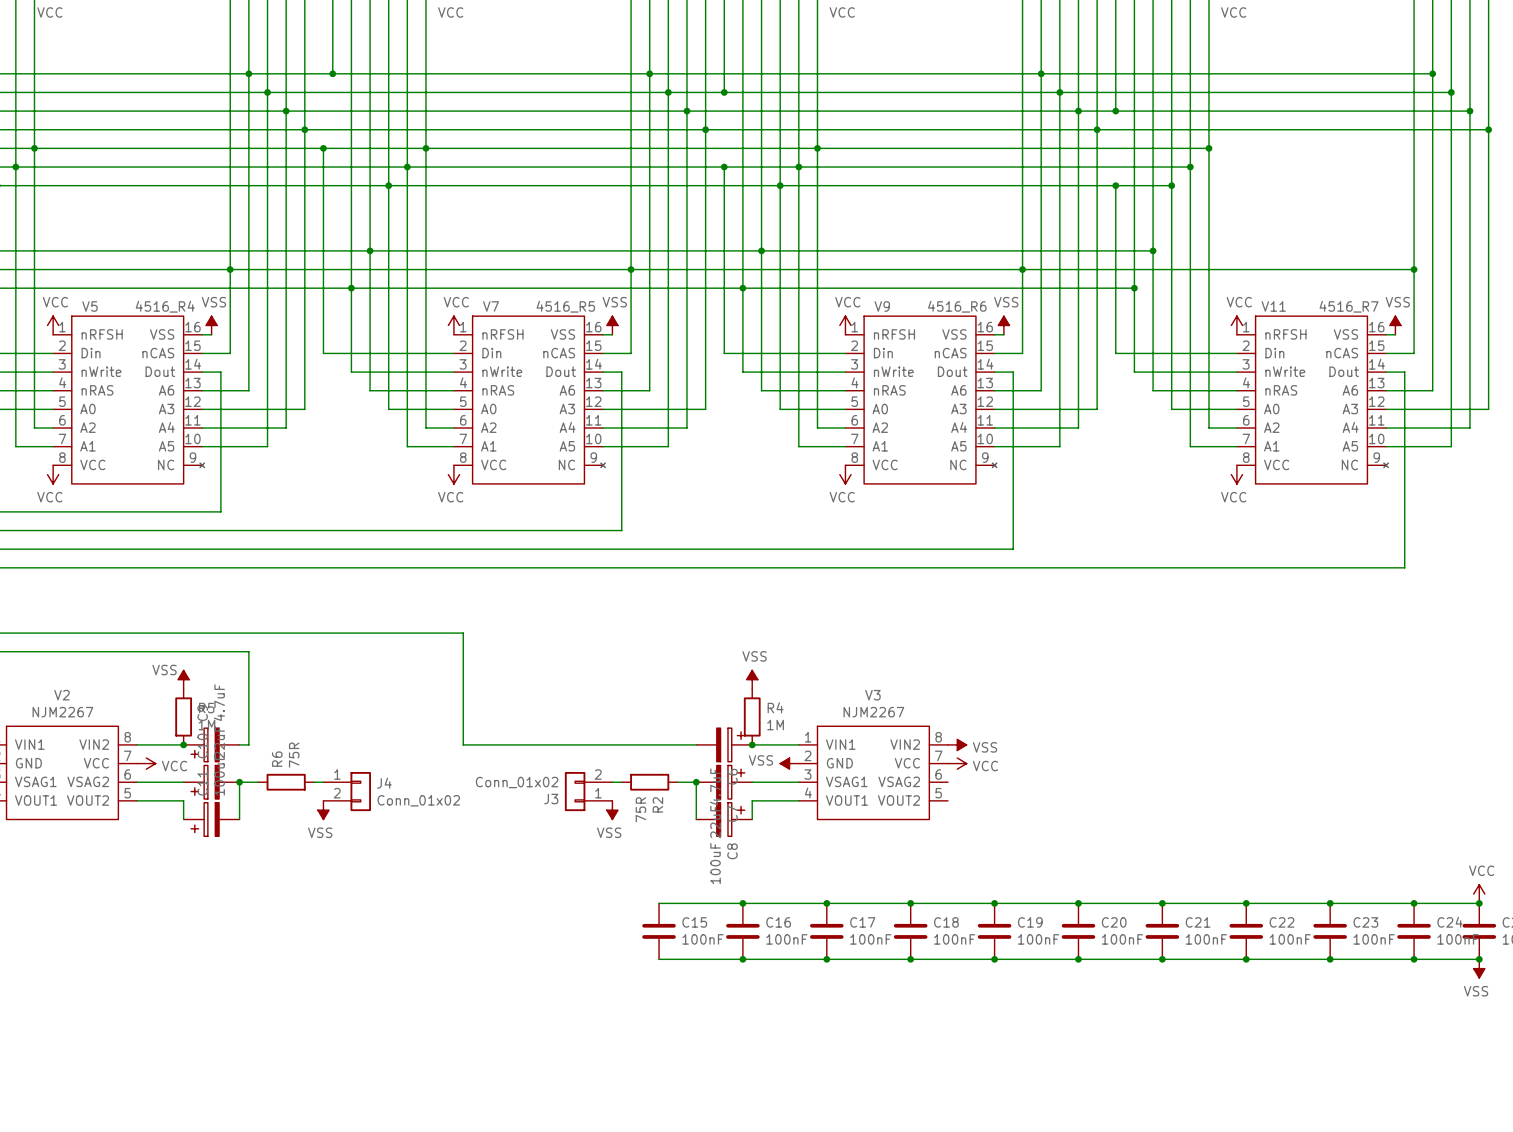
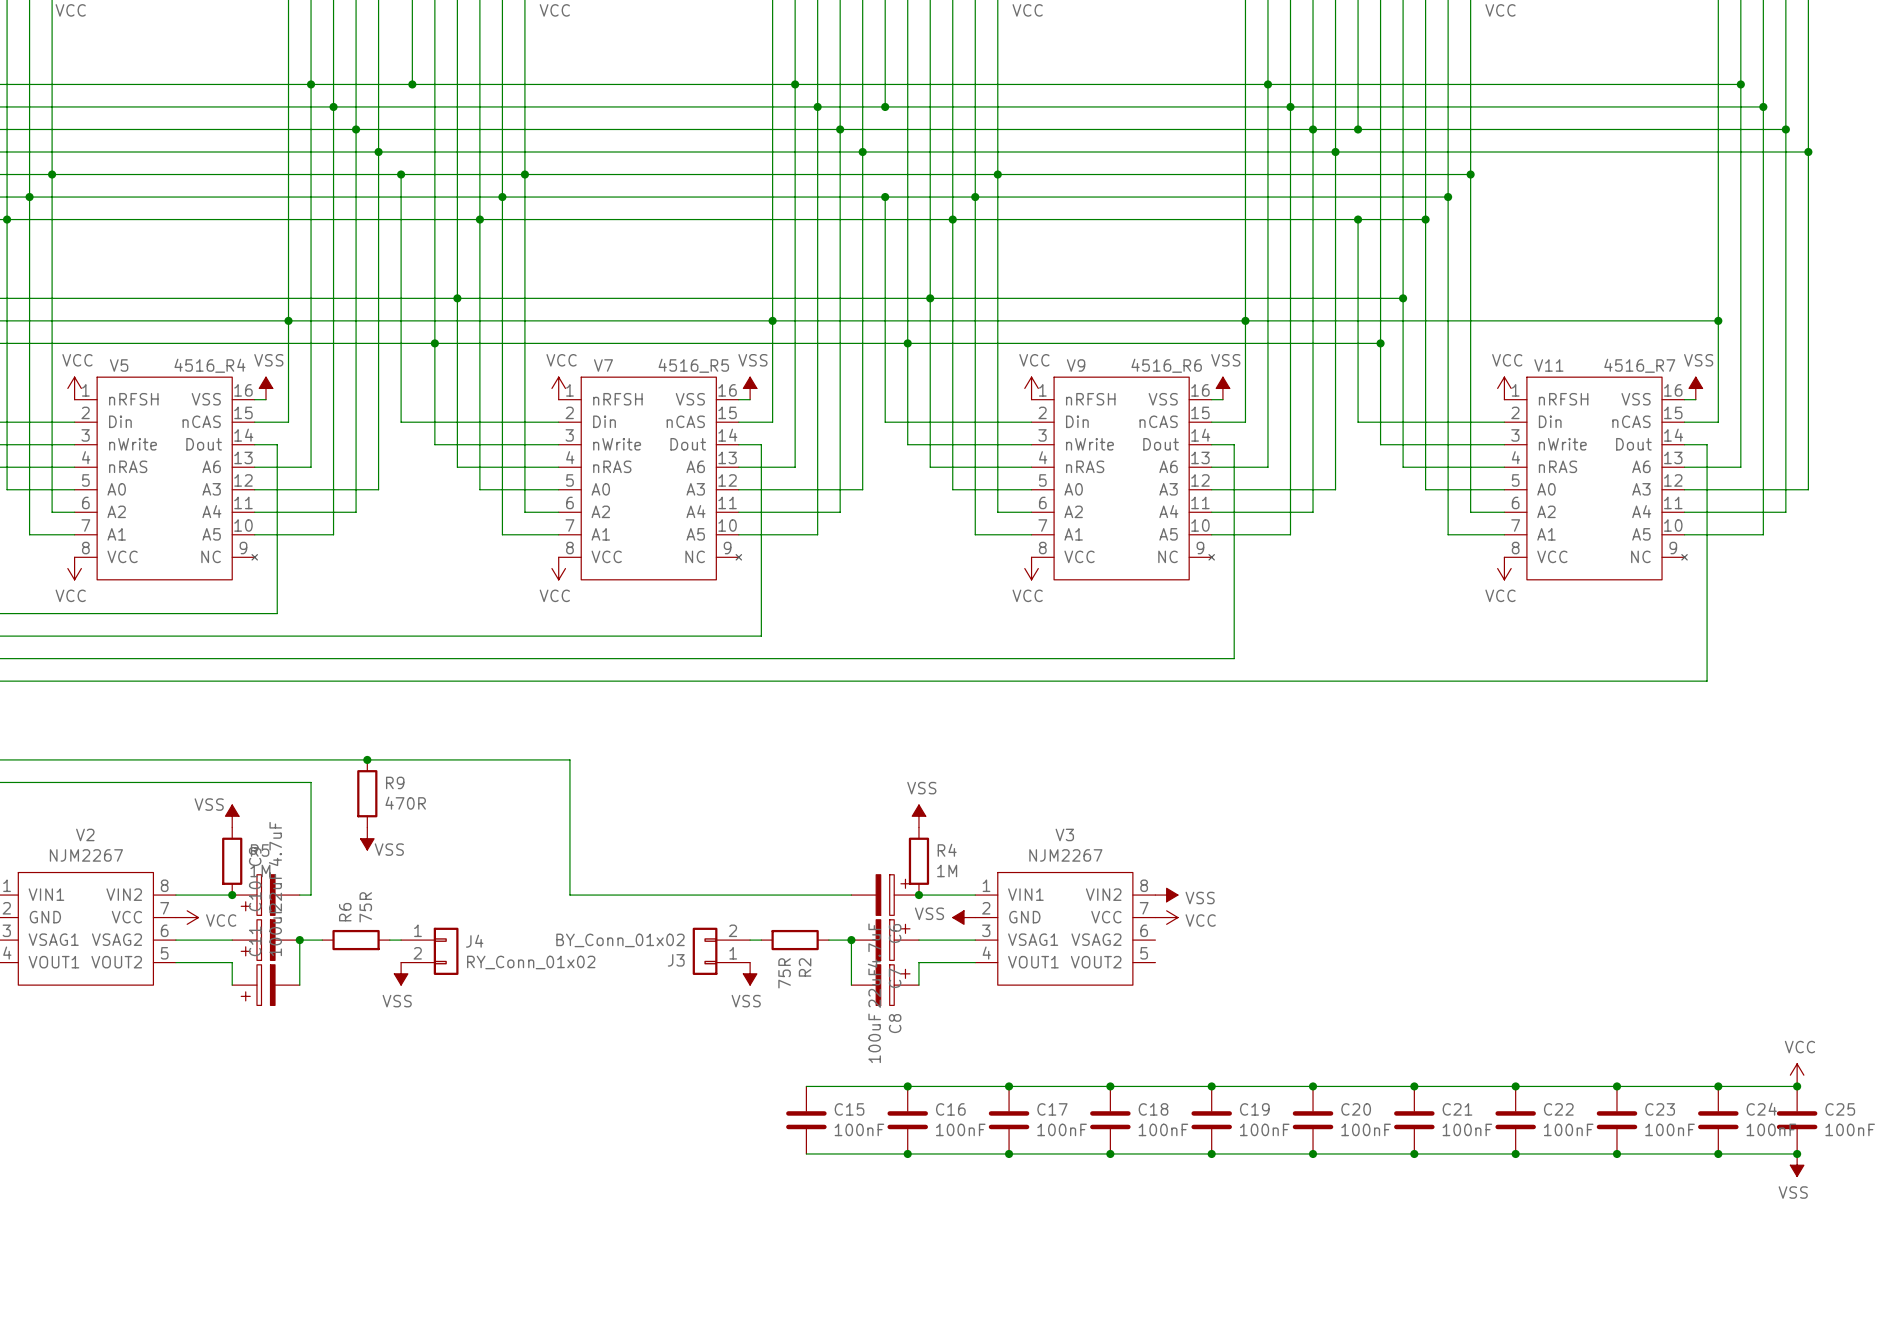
junction: none -> (367, 759)
R9: none -> 470R (367, 793)
power symbol: none -> VSS (367, 838)
J3 value: Conn_01x02 (517, 782) -> BY_Conn_01x02 (620, 940)
J4 value: Conn_01x02 (418, 800) -> RY_Conn_01x02 (531, 962)

